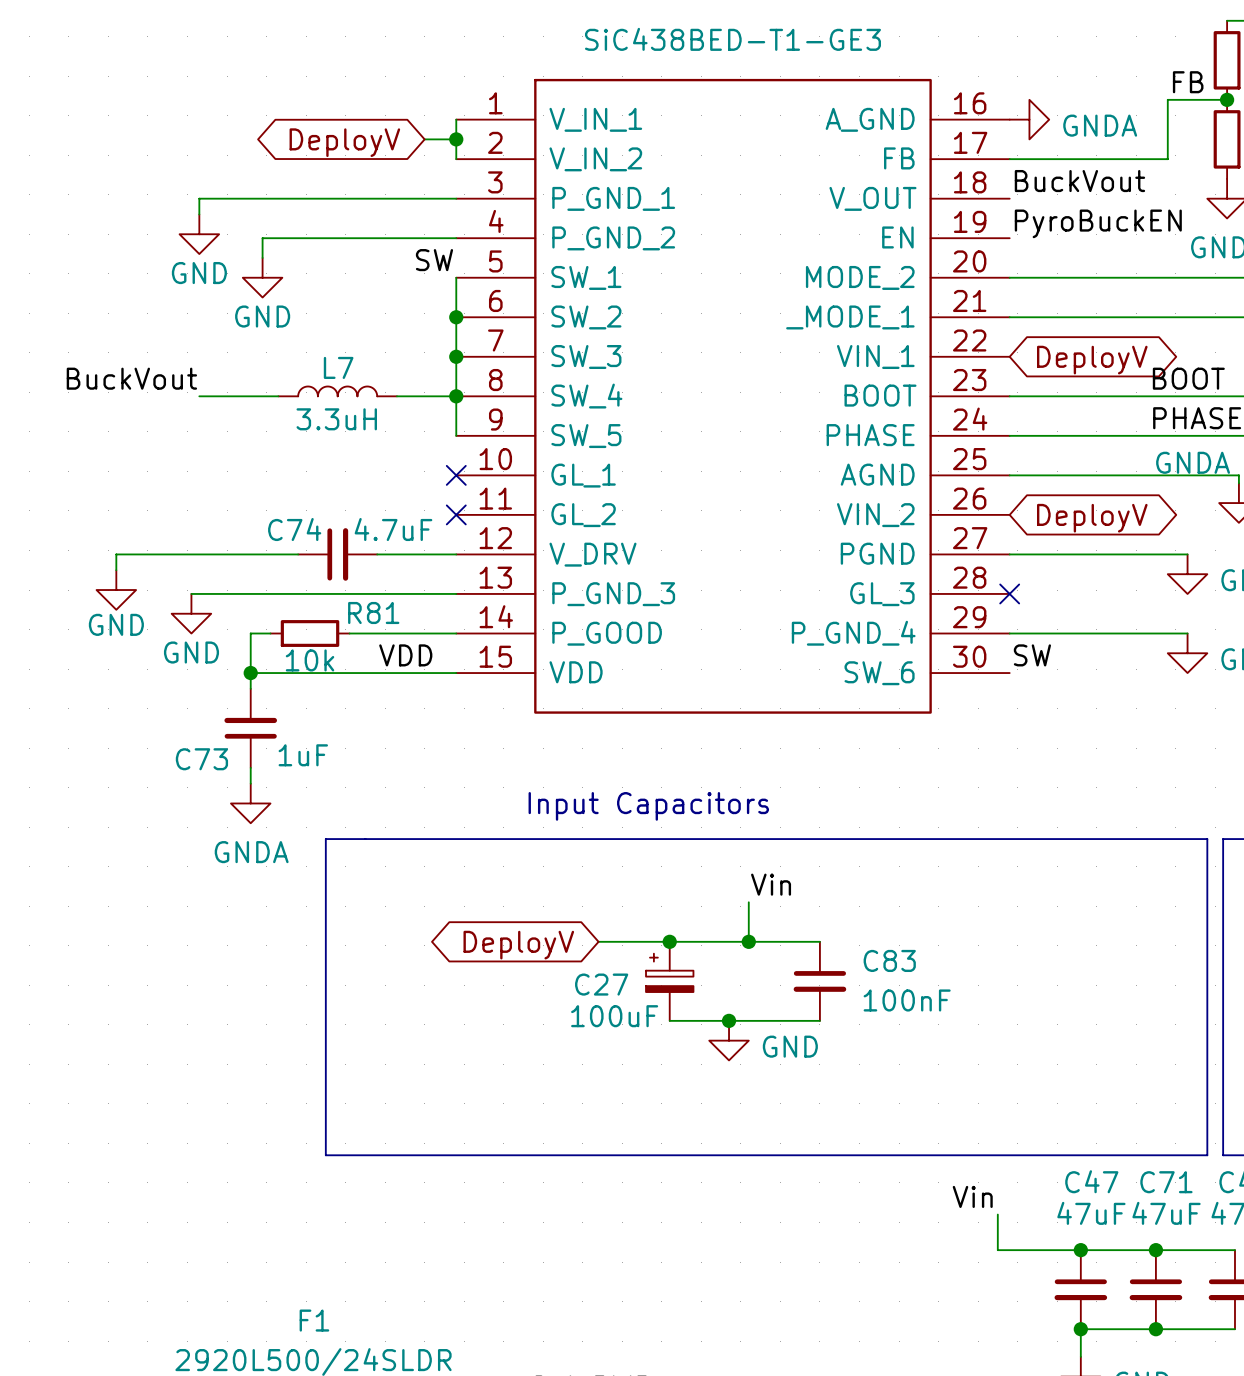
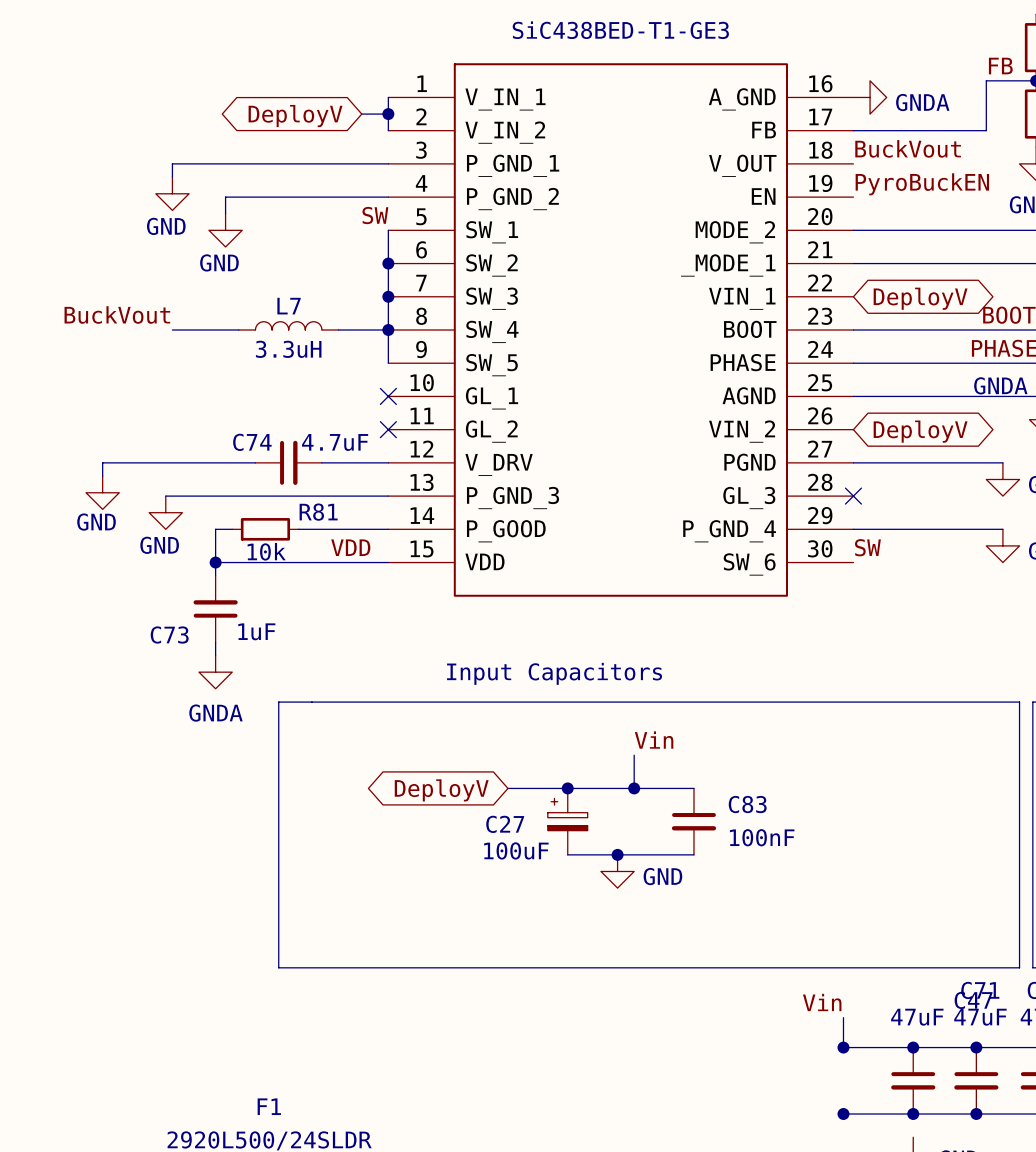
C47 name position: C47 (1091, 1181) -> C47 (973, 1000)
junction: none -> (843, 1047)
junction: none -> (843, 1113)
wire: (1080, 1329) (1080, 1356) -> (913, 1113) (843, 1113)

